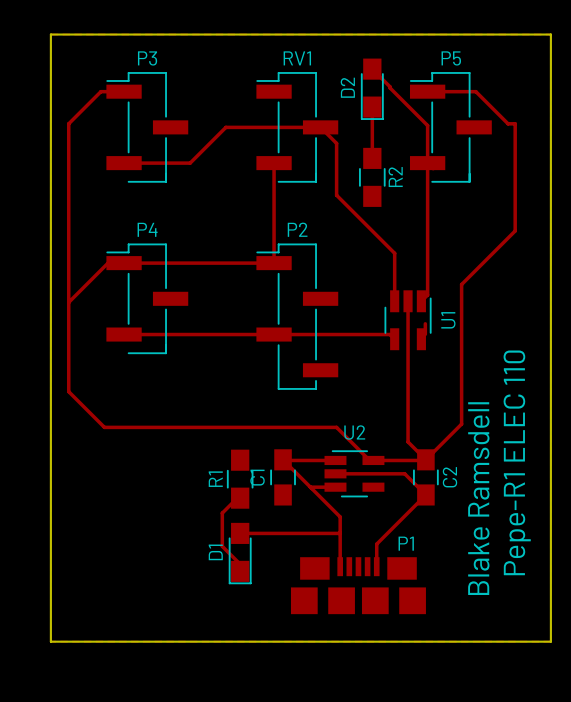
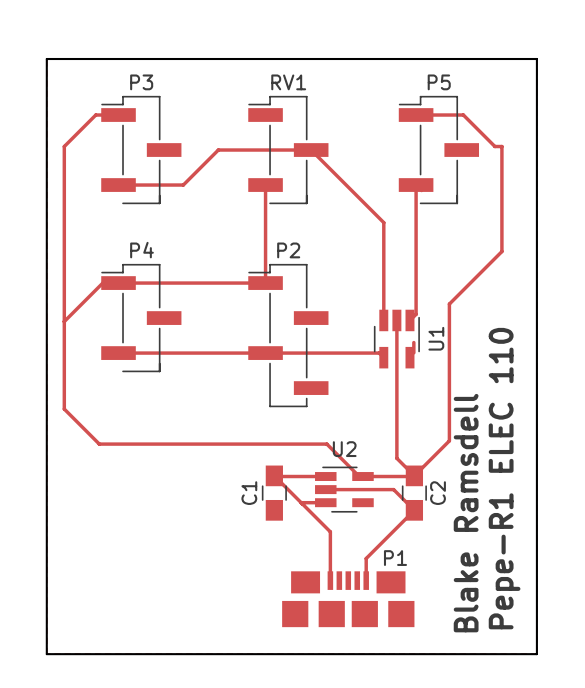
top track: (372, 69) (427, 125) (427, 163) -> none
D2: (372, 89) -> none
top track: (372, 107) (372, 158) -> none
top track: (336, 143) (336, 195) (394, 253) -> (326, 165) (383, 222) (383, 273)
R2: (372, 177) -> none
R1: (240, 479) -> none
top track: (247, 498) (237, 498) (222, 513) (222, 546) (247, 571) -> none
top track: (247, 533) (340, 533) -> none
D1: (240, 553) -> none

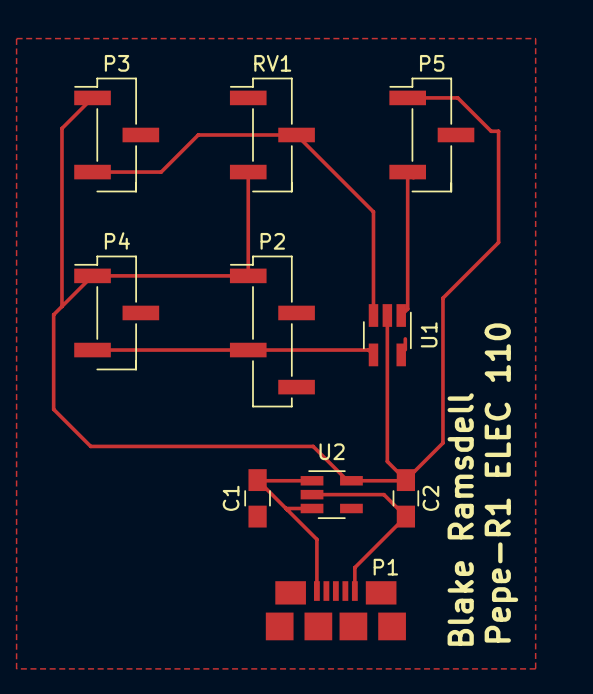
board edge: (46, 59) (46, 654) (536, 654) (536, 59) (46, 59) -> none
top track: (118, 115) (95, 115) (64, 146) (64, 409) (99, 444) (116, 444) -> (92, 97) (61, 128) (61, 306)
top track: (118, 283) (102, 283) (64, 321) -> (92, 275) (53, 314) (53, 409) (90, 446)

